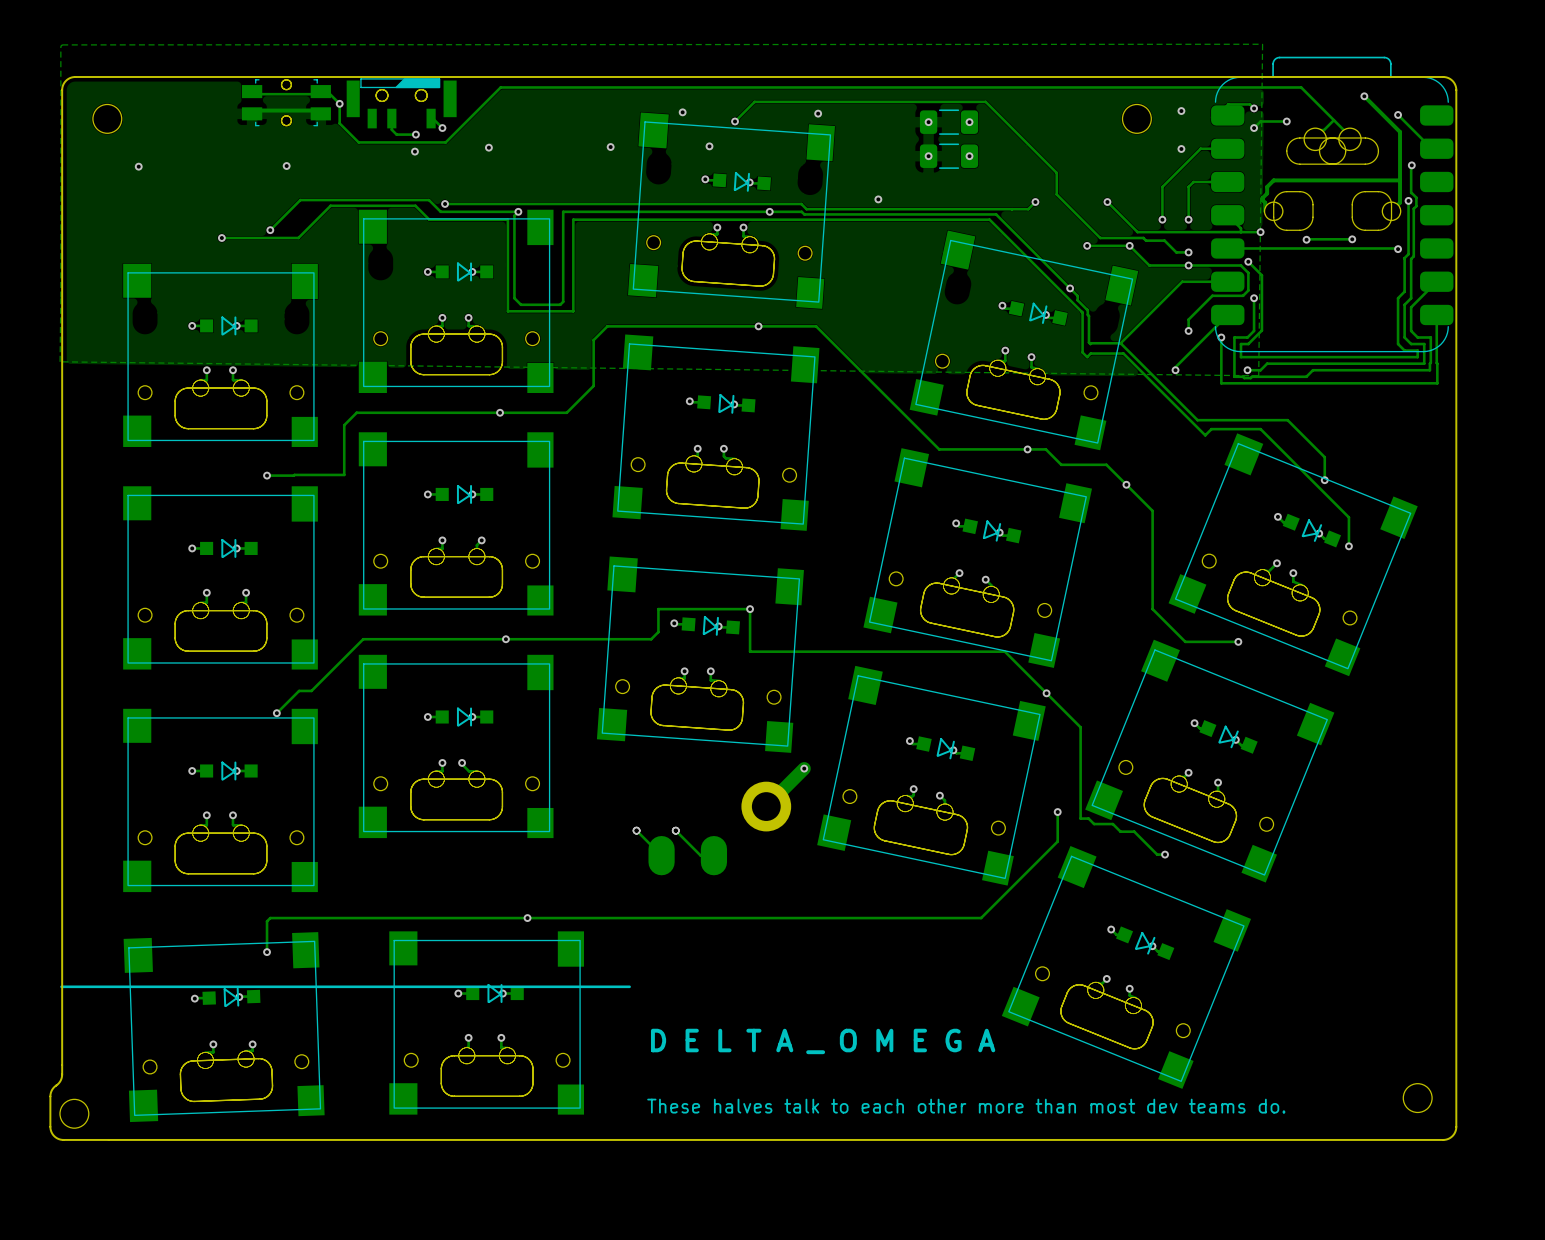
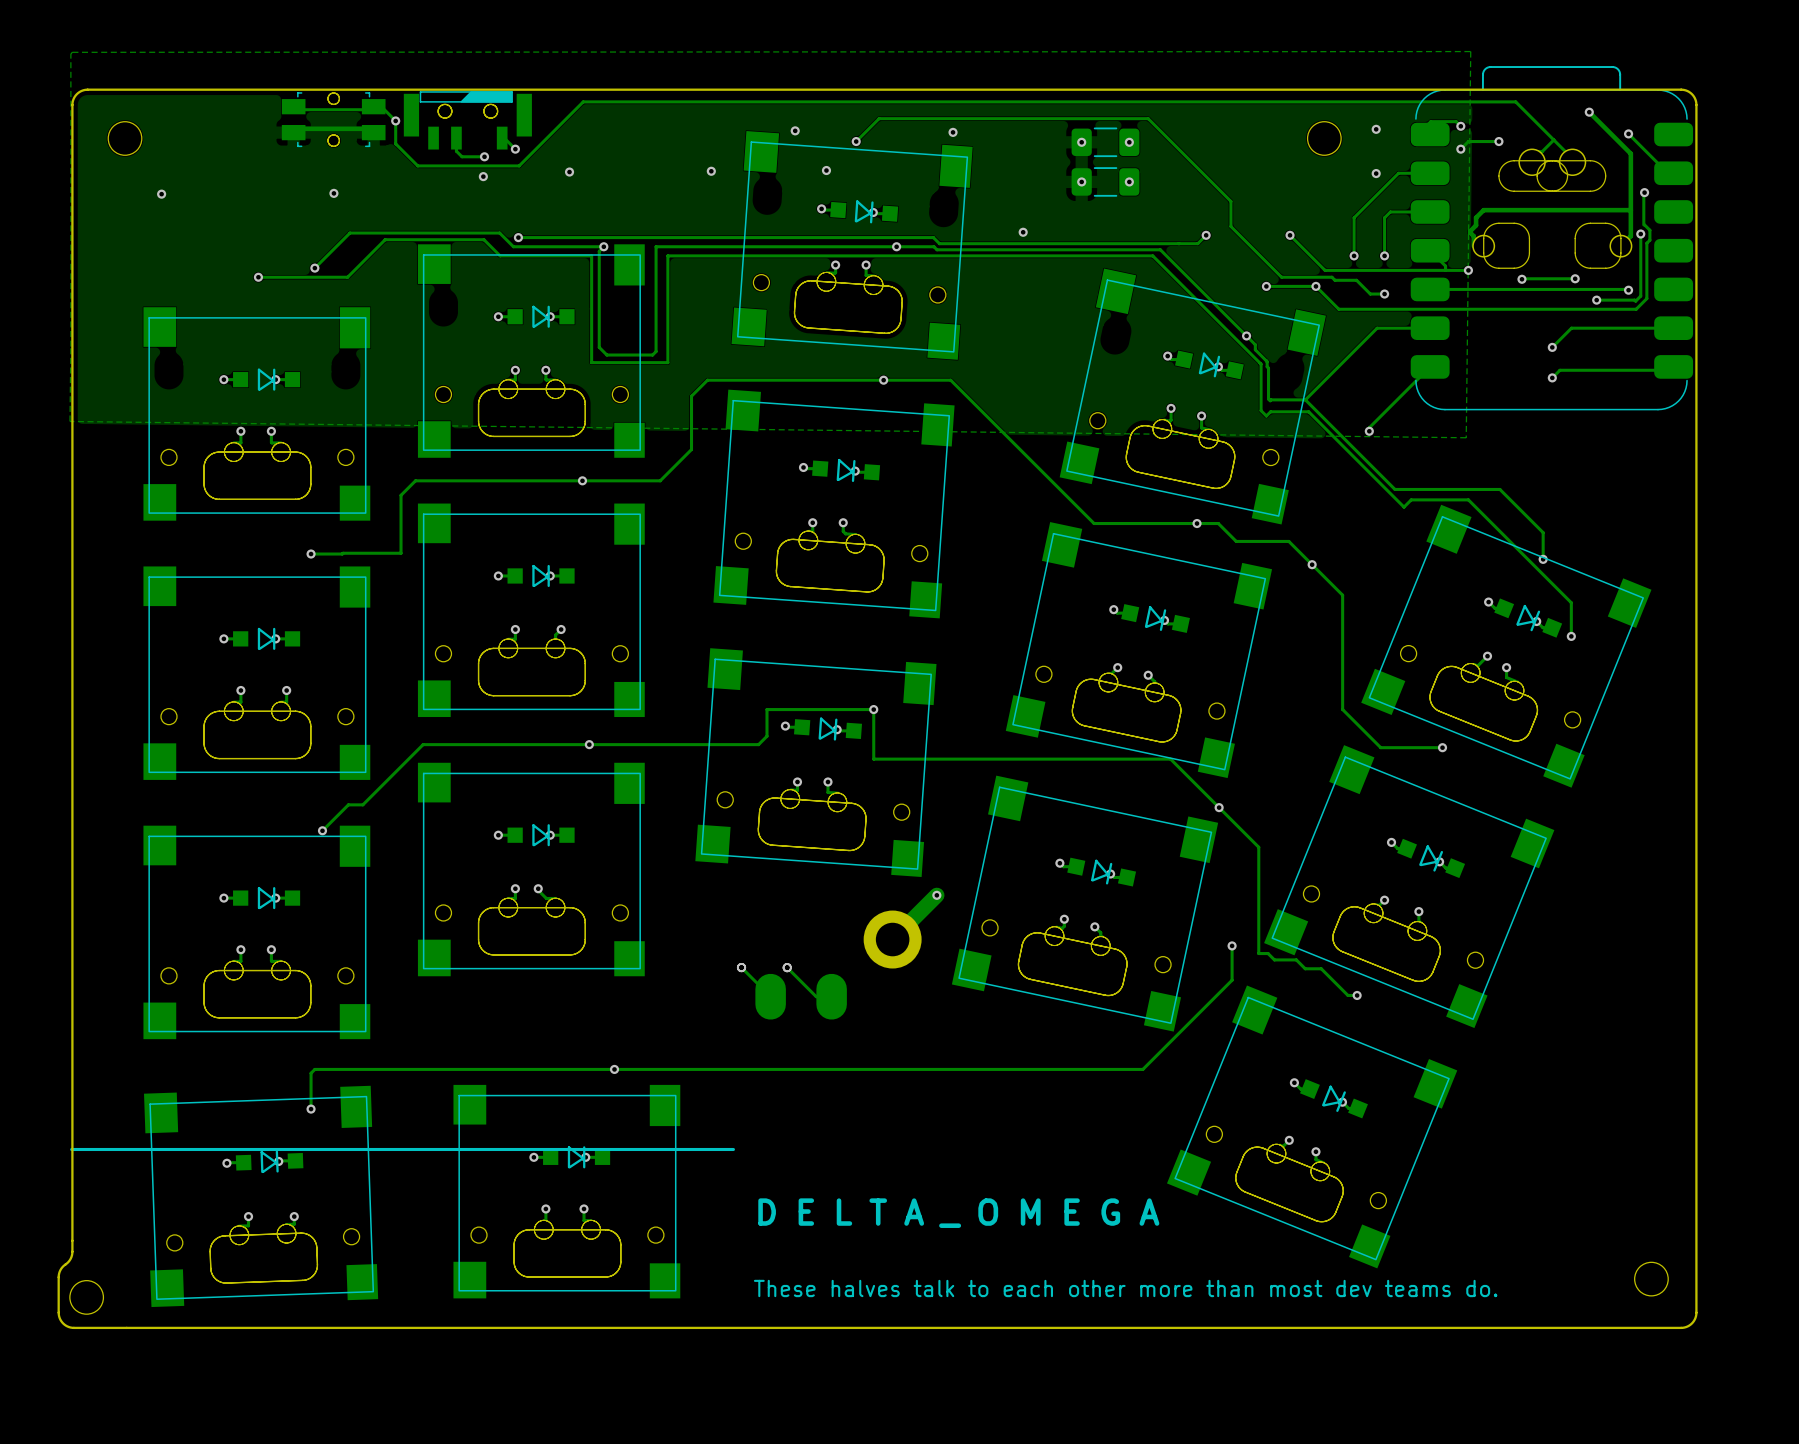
via: none -> (1596, 300)
track: (1404, 258) (1404, 291) (1398, 298) (1398, 344) (1404, 350) (1417, 350) (1417, 357) (1240, 357) (1240, 344) (1248, 344) (1261, 330) (1261, 275) (1248, 261) -> (1635, 301) (1596, 300)
track: (1411, 258) (1411, 298) (1404, 304) (1404, 337) (1411, 344) (1424, 344) (1424, 363) (1267, 363) (1260, 370) (1247, 370) -> (1643, 301) (1636, 309) (1445, 309)
via: (1248, 261) -> none
via: (1188, 265) -> none
track: (1240, 265) (1248, 272) (1248, 290) (1243, 295) (1212, 295) (1188, 319) (1188, 330) -> none
track: (1436, 281) (1411, 307) (1411, 330) (1417, 337) (1430, 337) (1429, 370) (1312, 370) (1306, 376) (1234, 376) (1234, 337) (1247, 337) (1254, 330) (1254, 298) -> (1673, 328) (1571, 328) (1552, 347)
via: (1254, 298) -> none
via: none -> (1552, 347)
track: (1436, 314) (1437, 383) (1221, 383) (1221, 337) -> none
track: none -> (1659, 370) (1559, 370) (1552, 377)
via: none -> (1552, 377)
via: (1188, 330) -> none
via: (1221, 337) -> none
via: (1247, 370) -> none

